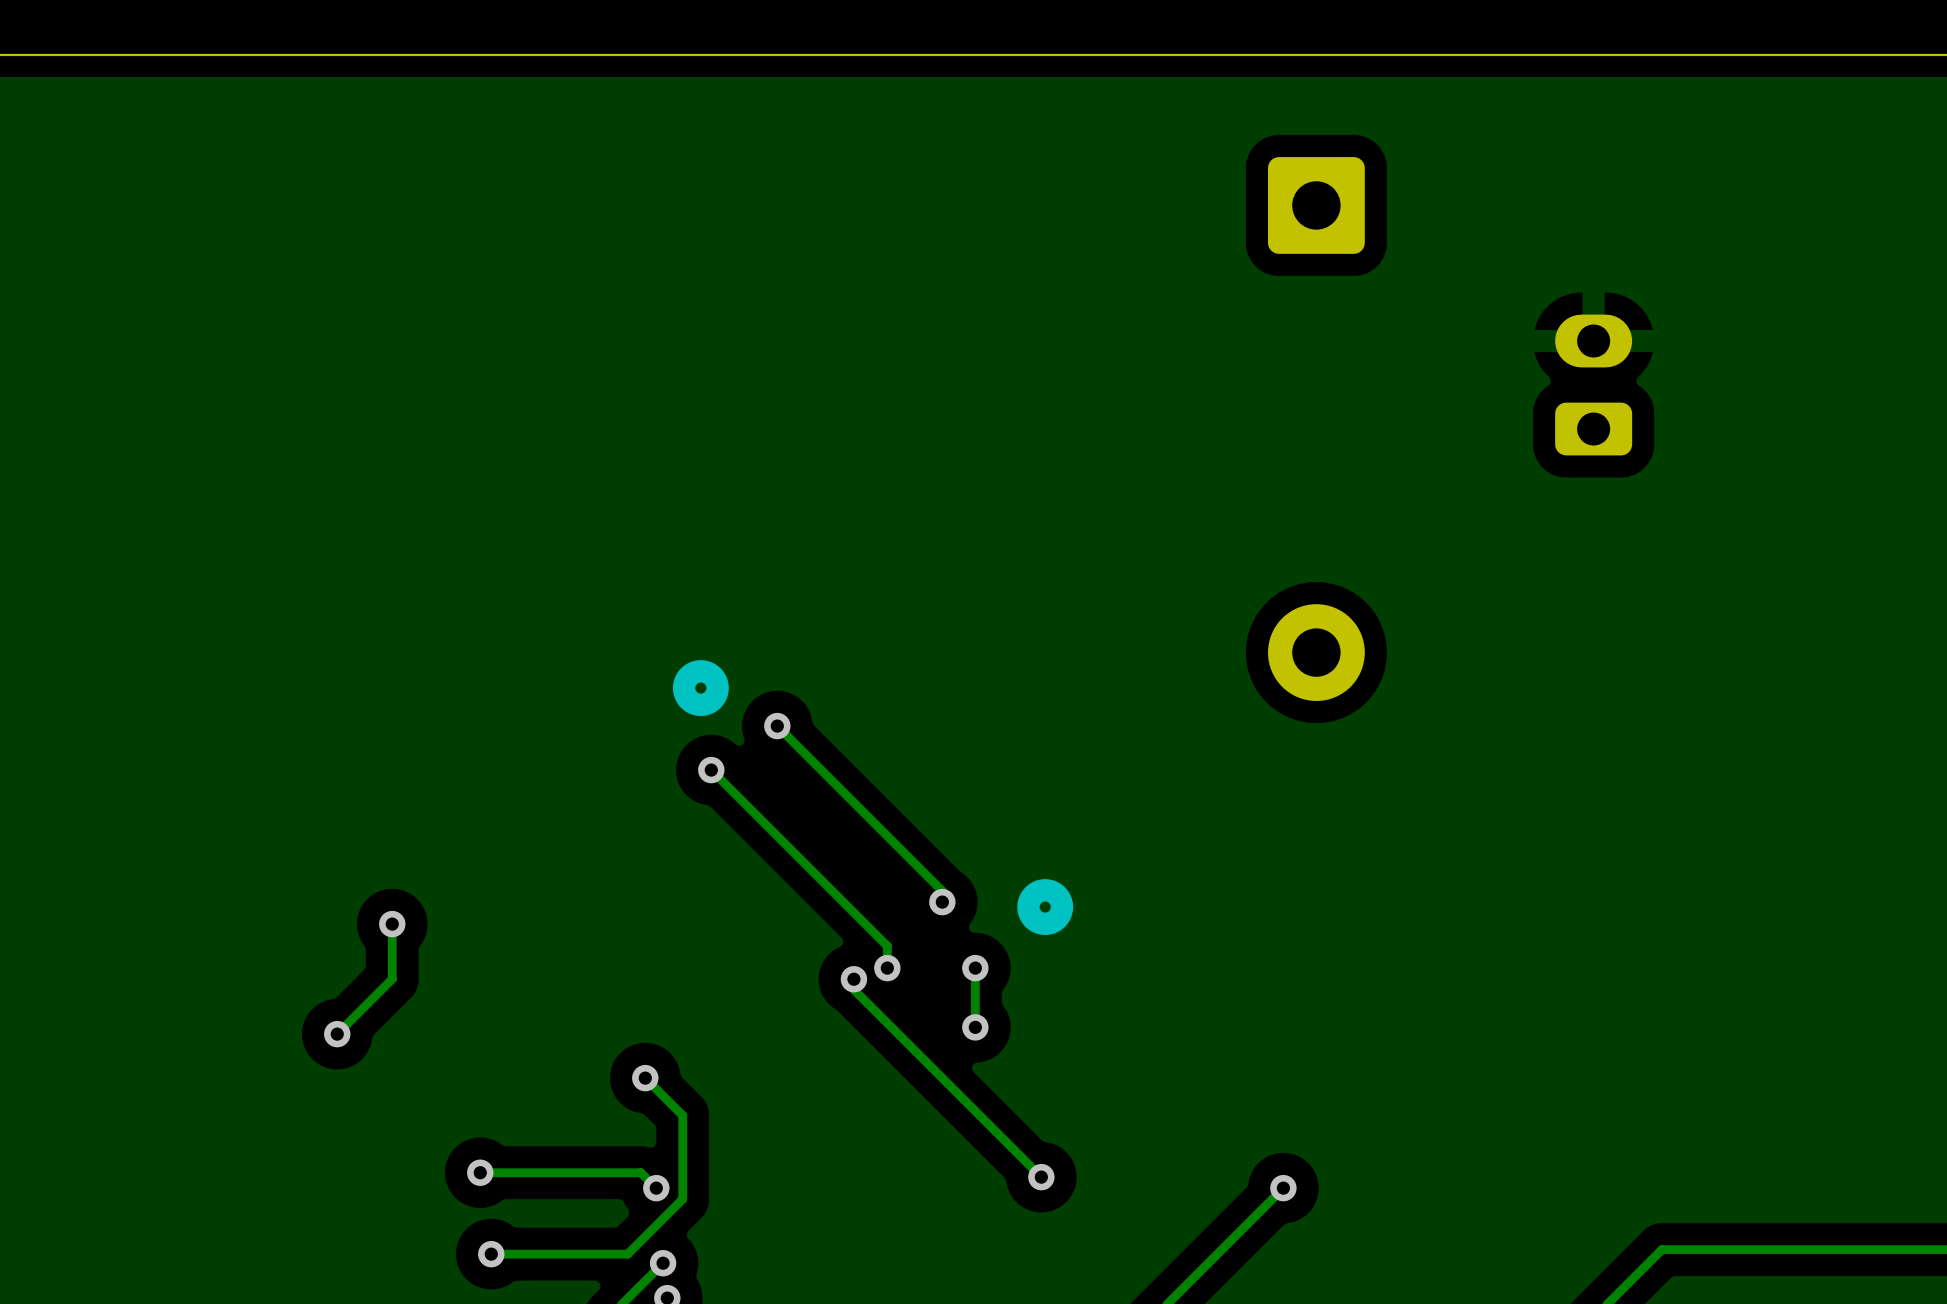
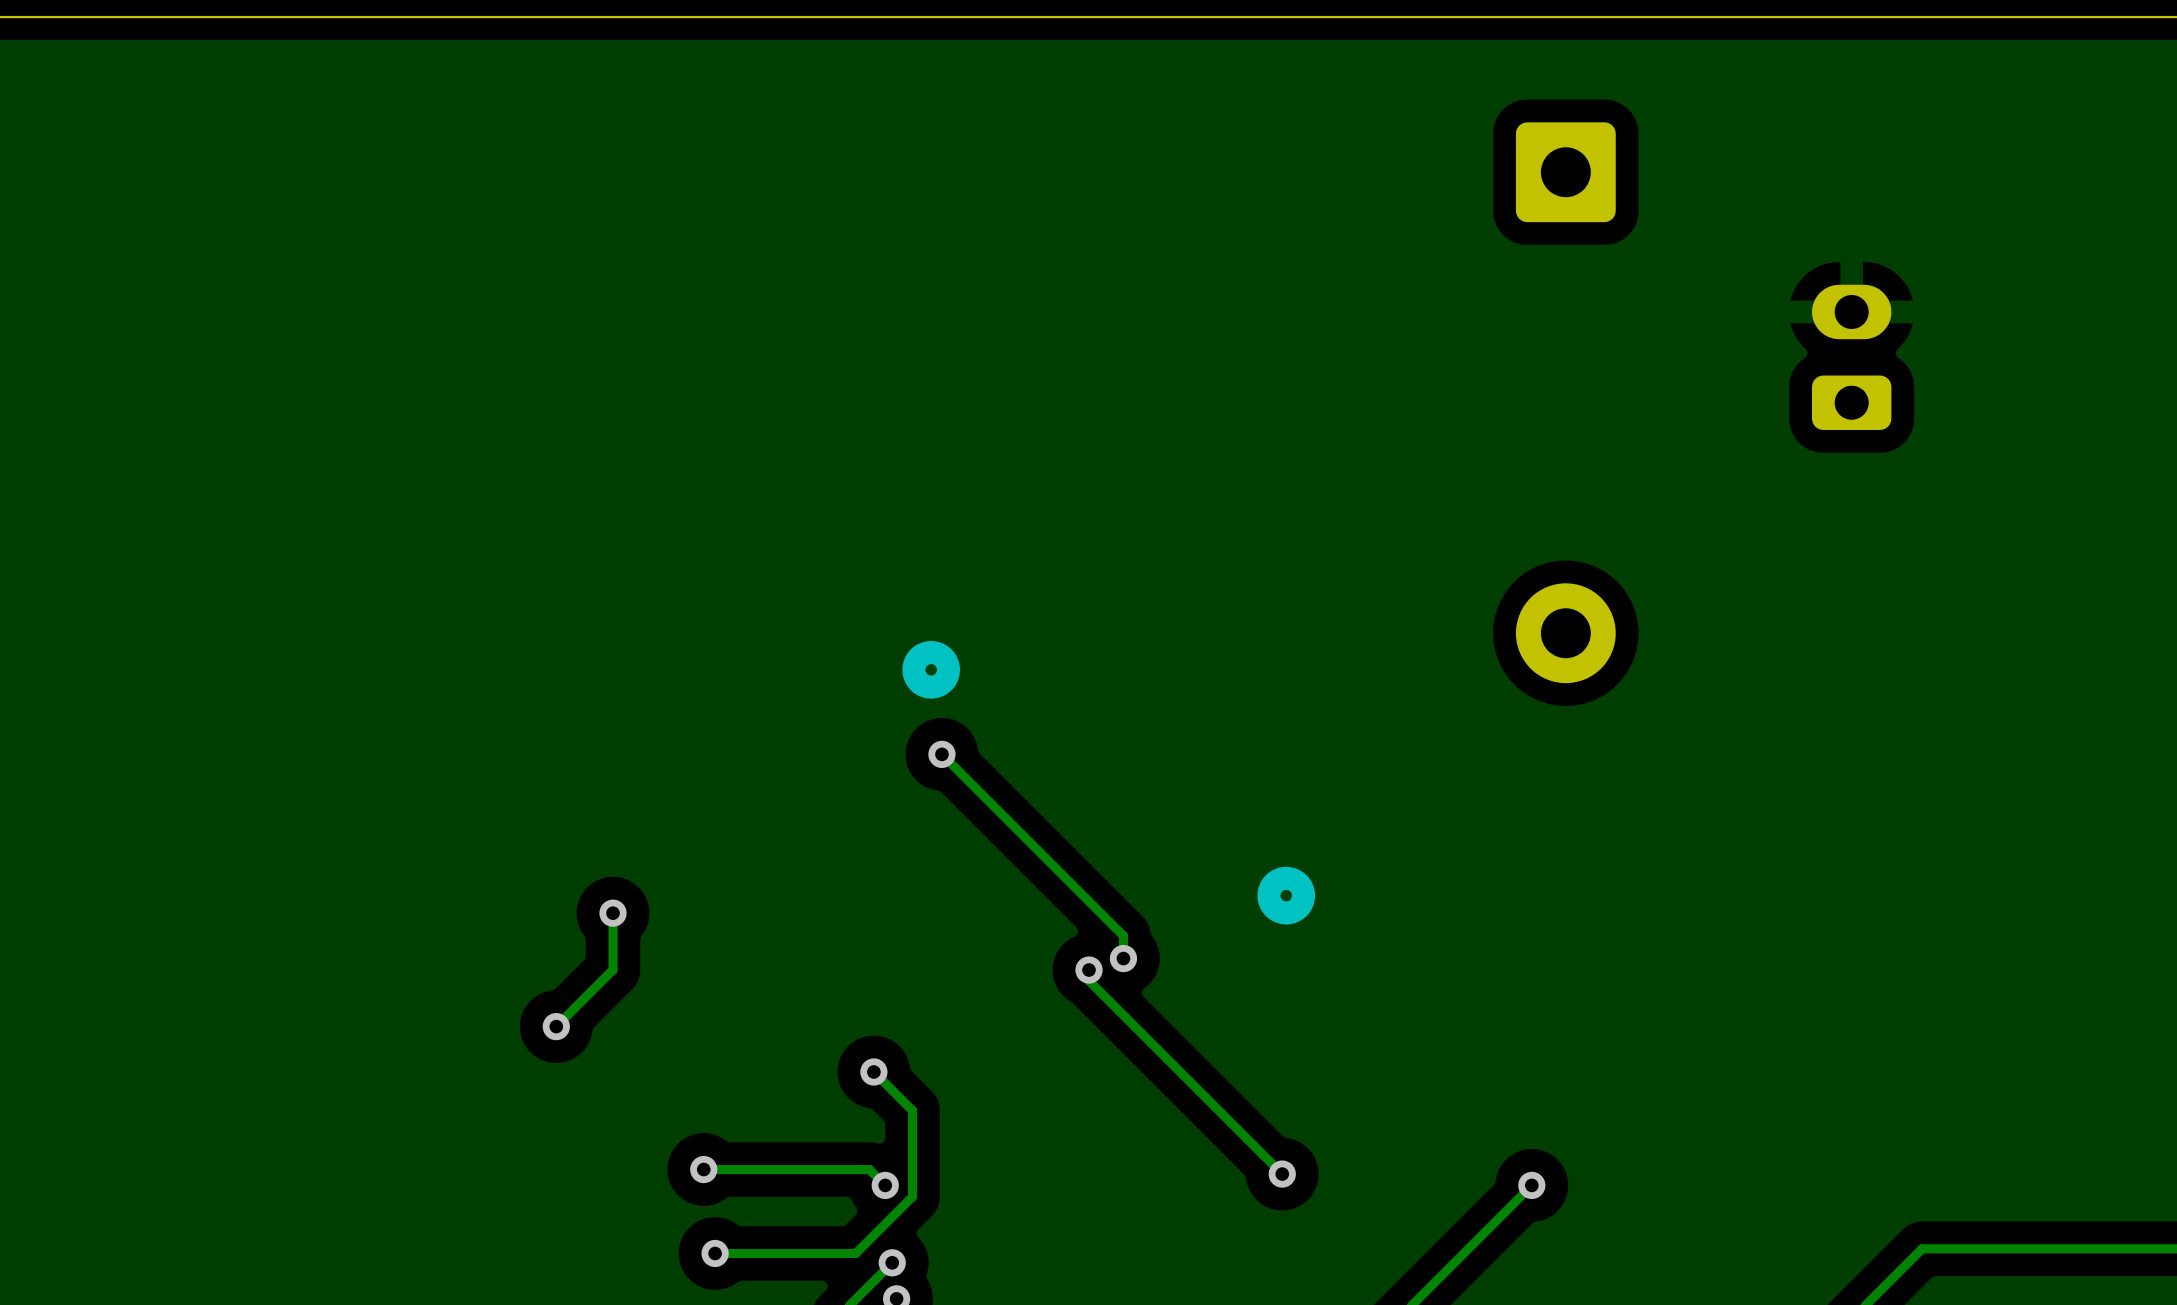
track: (777, 726) (942, 891) (942, 902) -> none
via: (777, 726) -> none
via: (942, 902) -> none
track: (975, 968) (975, 1027) -> none
via: (975, 968) -> none
via: (975, 1027) -> none

